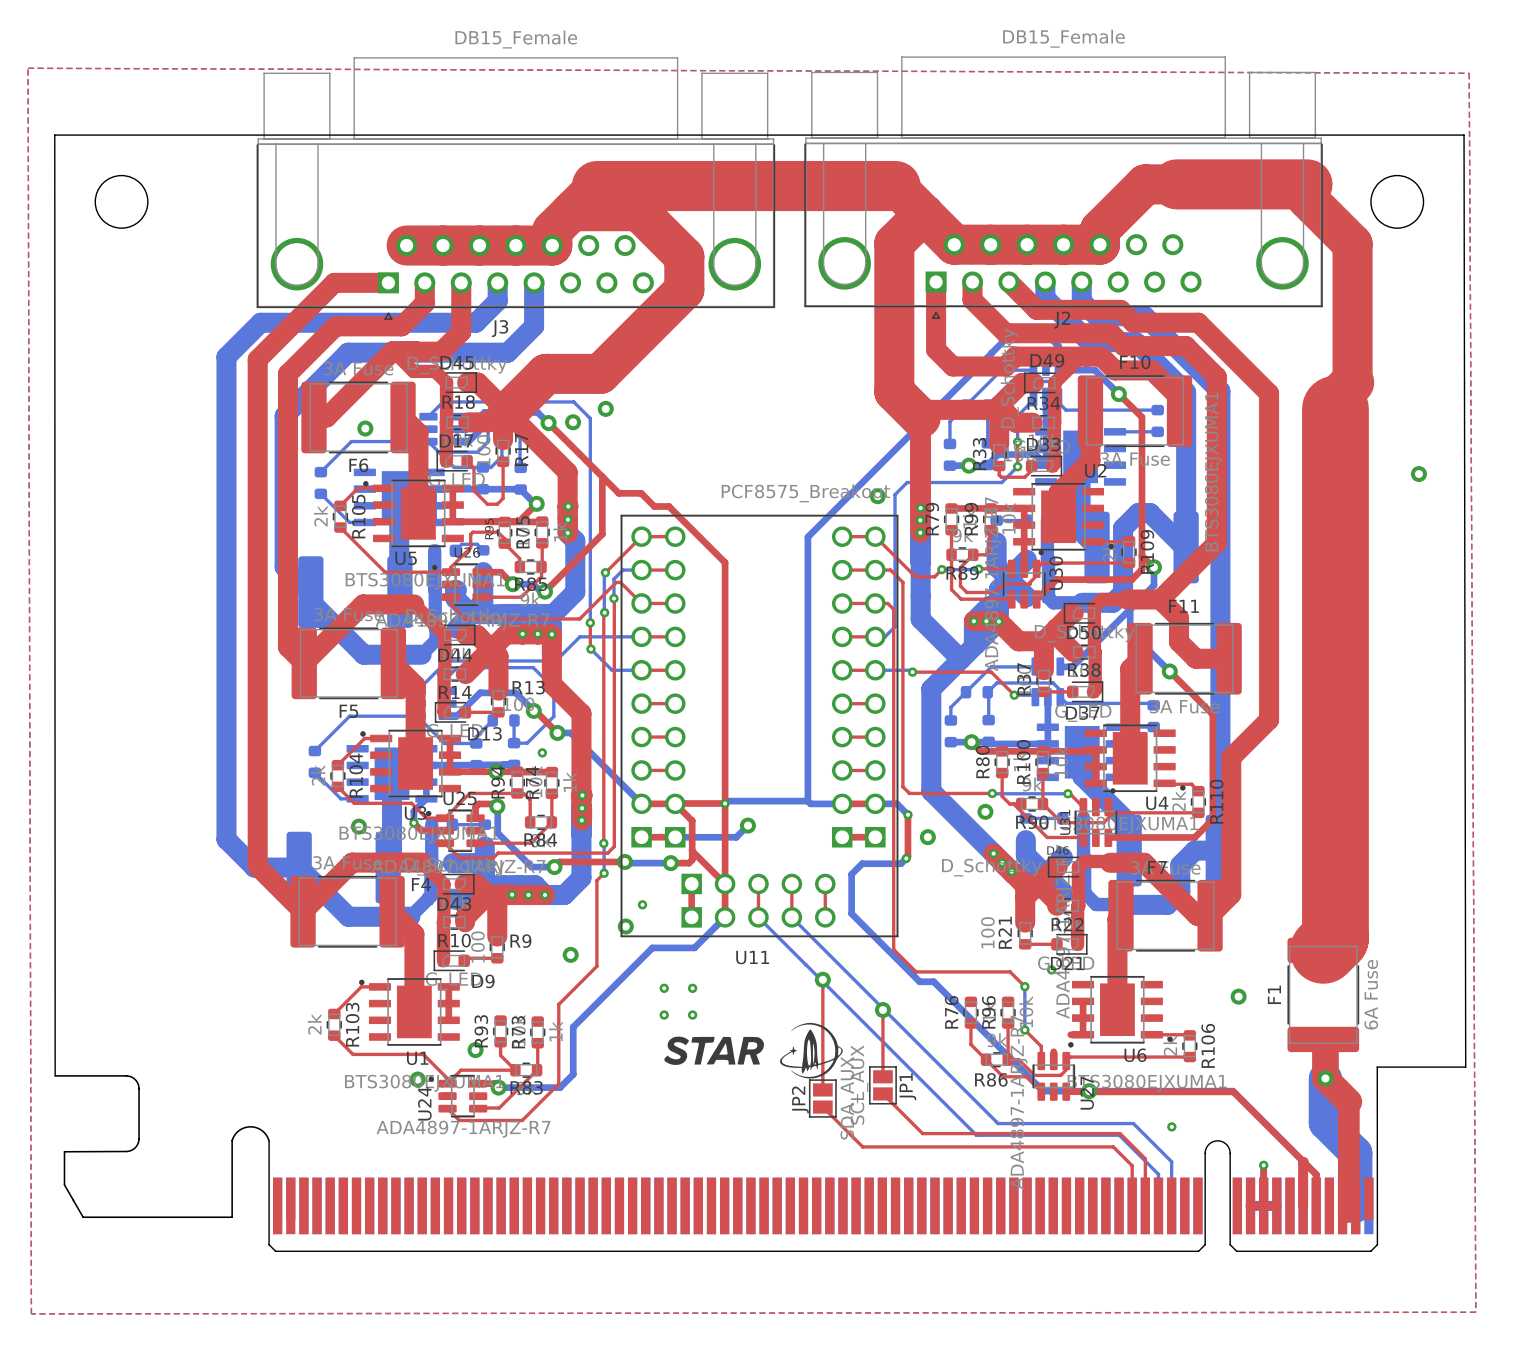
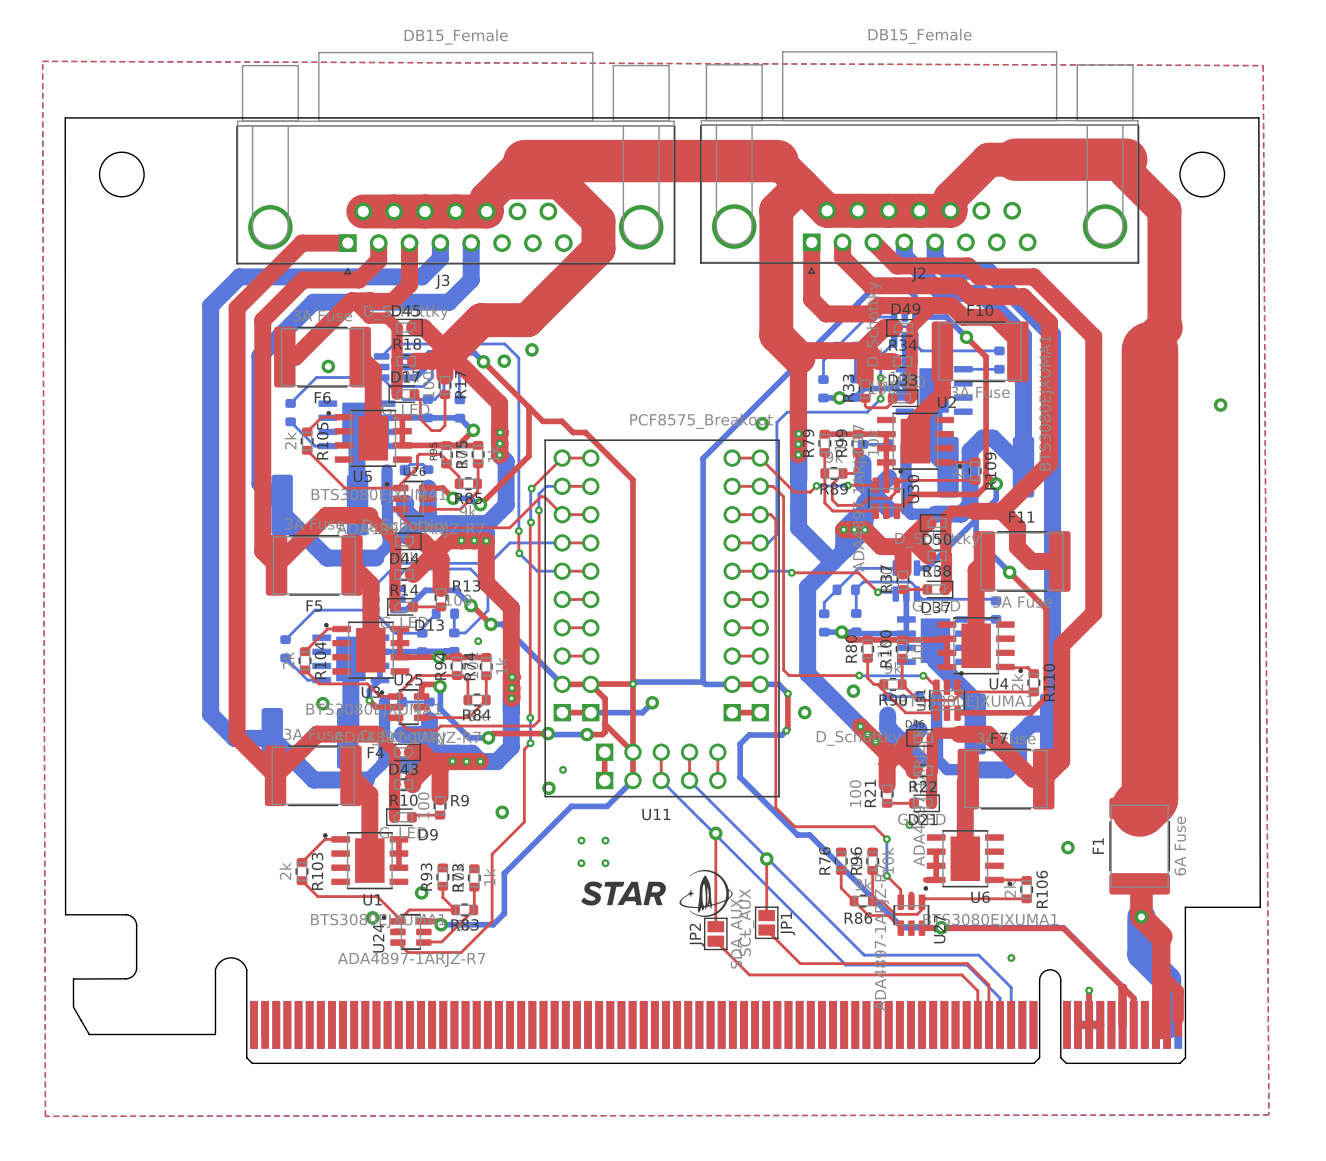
top track: none -> (1161, 973) (1178, 990) (1178, 1018)

